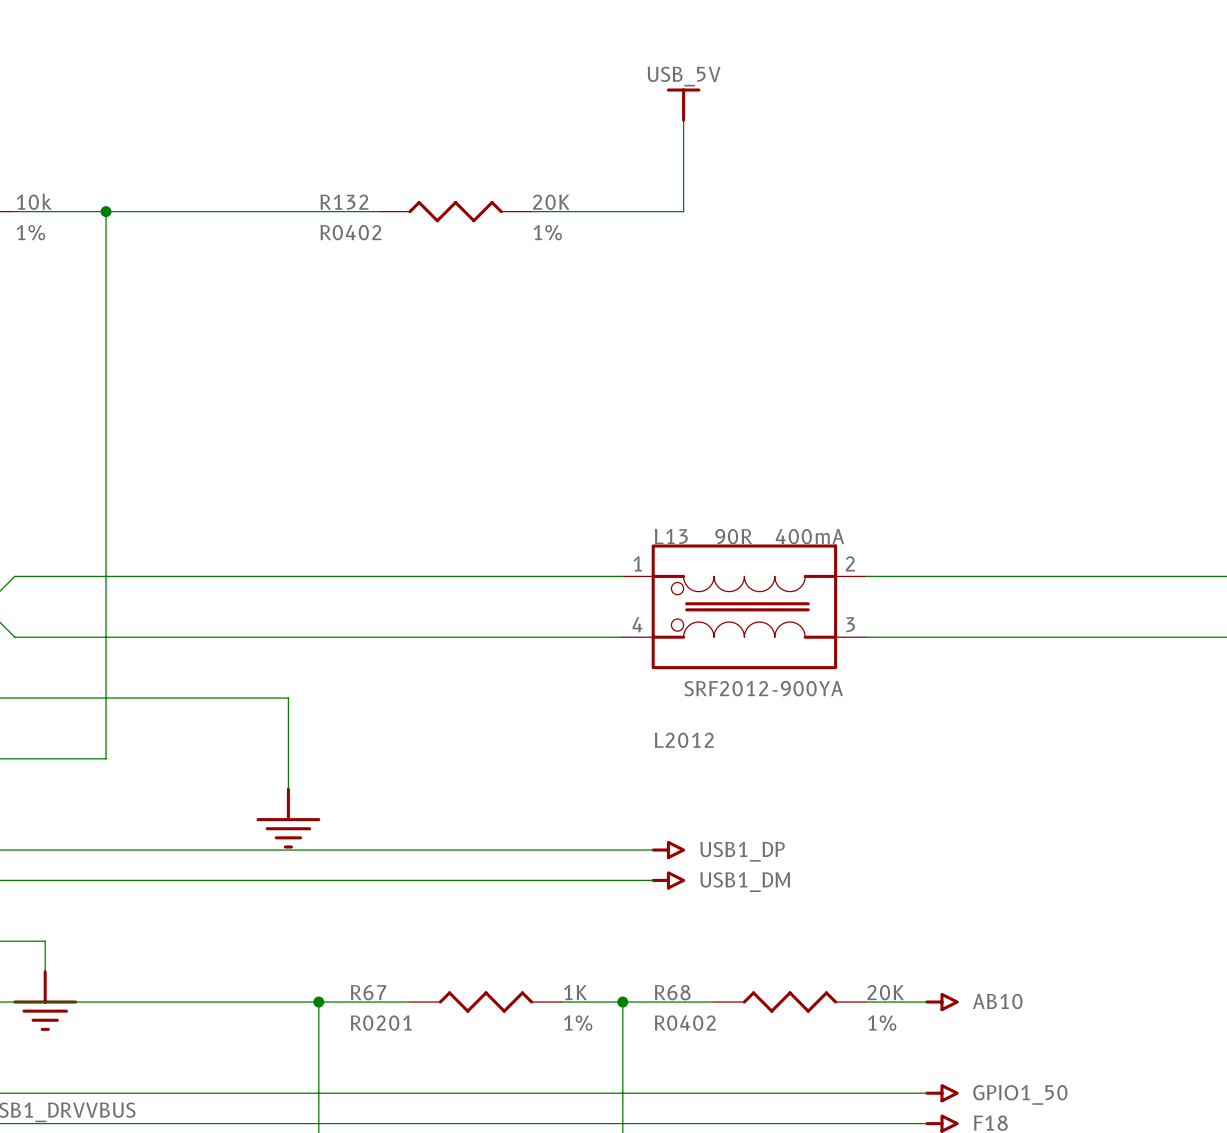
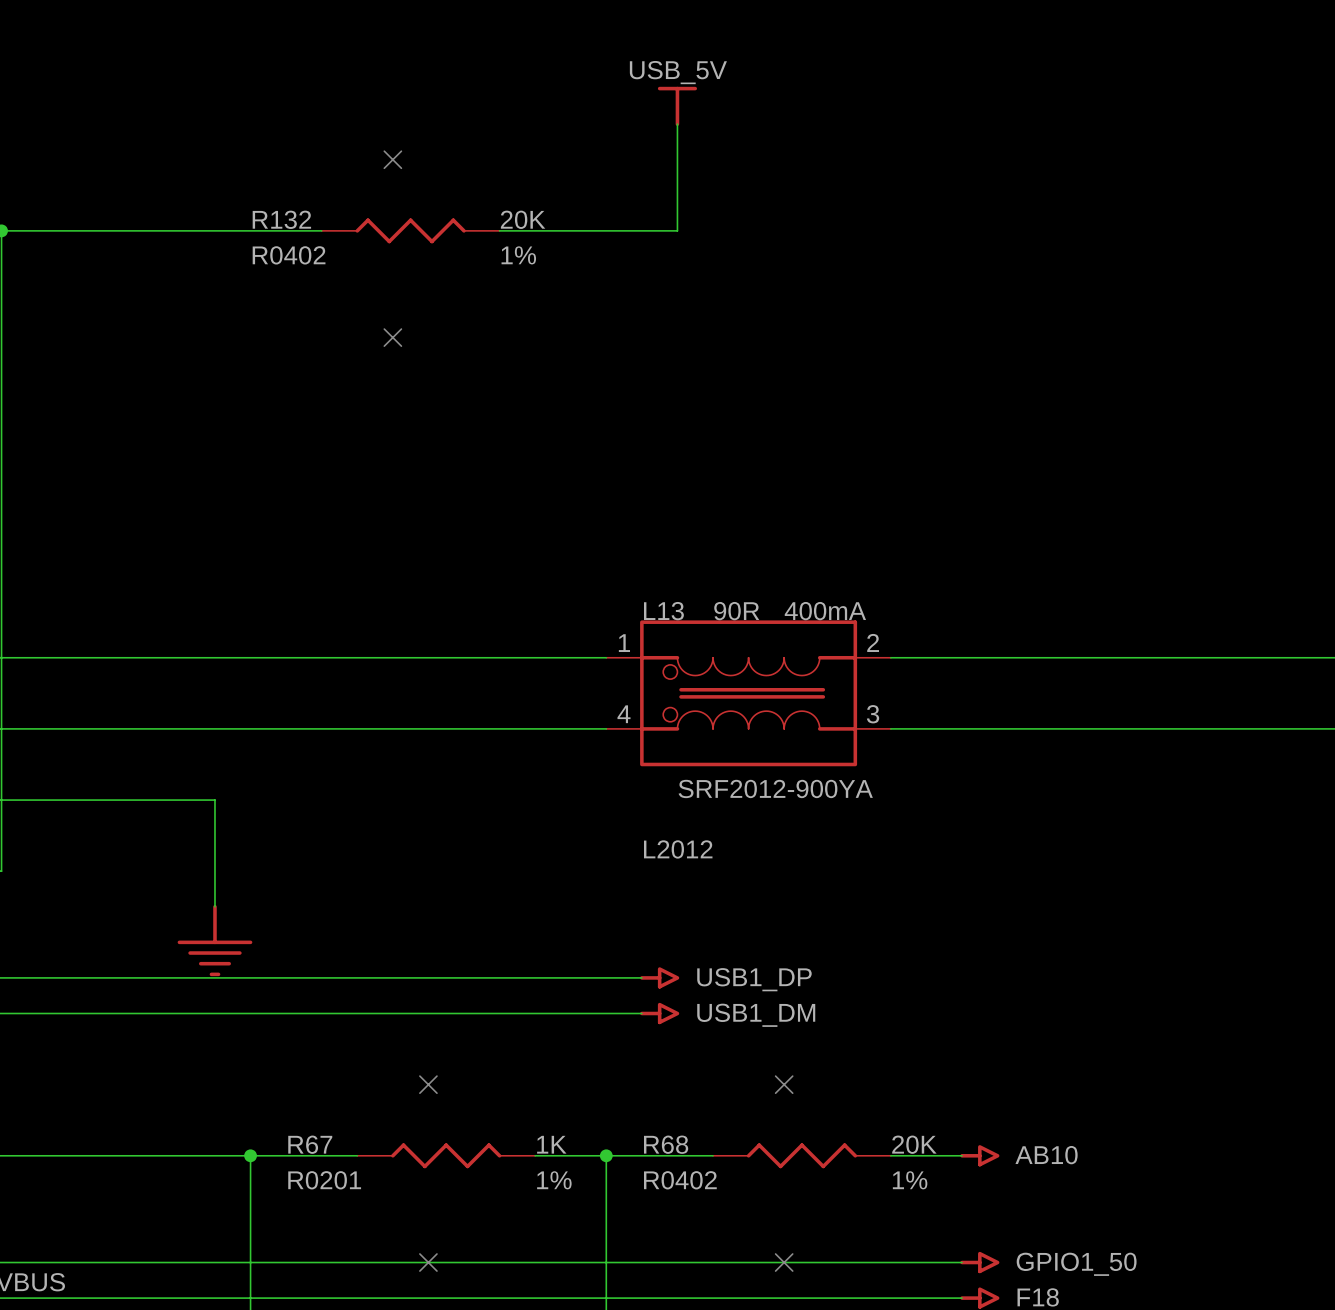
no-connect mark: none -> (392, 159)
no-connect mark: none -> (392, 337)
no-connect mark: none -> (428, 1084)
no-connect mark: none -> (784, 1084)
no-connect mark: none -> (428, 1262)
no-connect mark: none -> (784, 1262)

